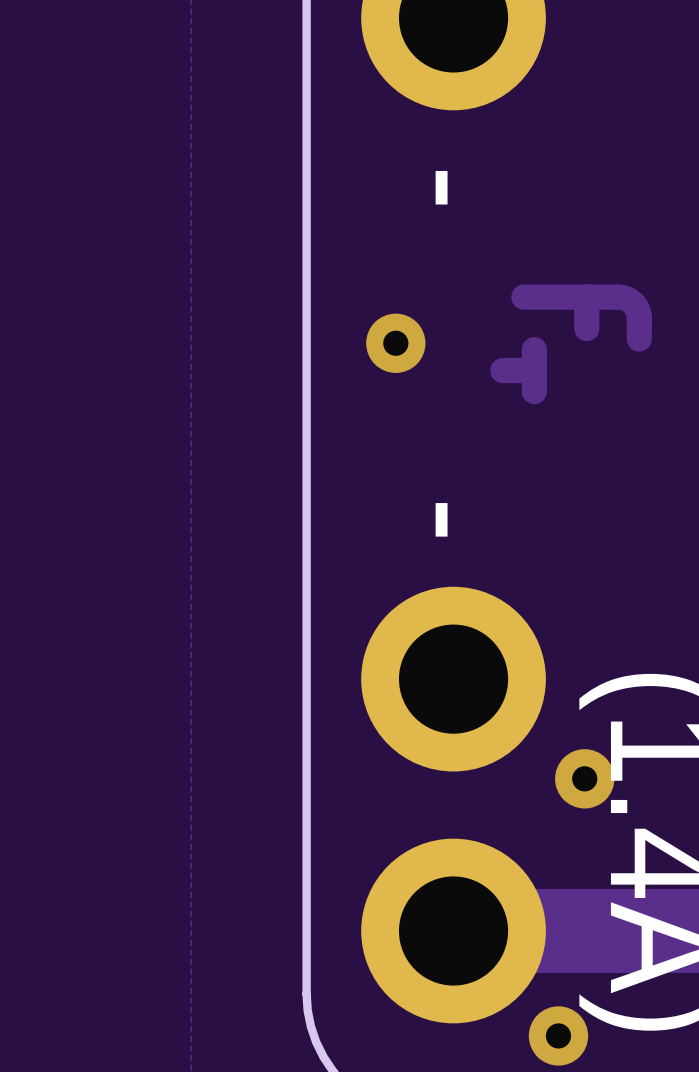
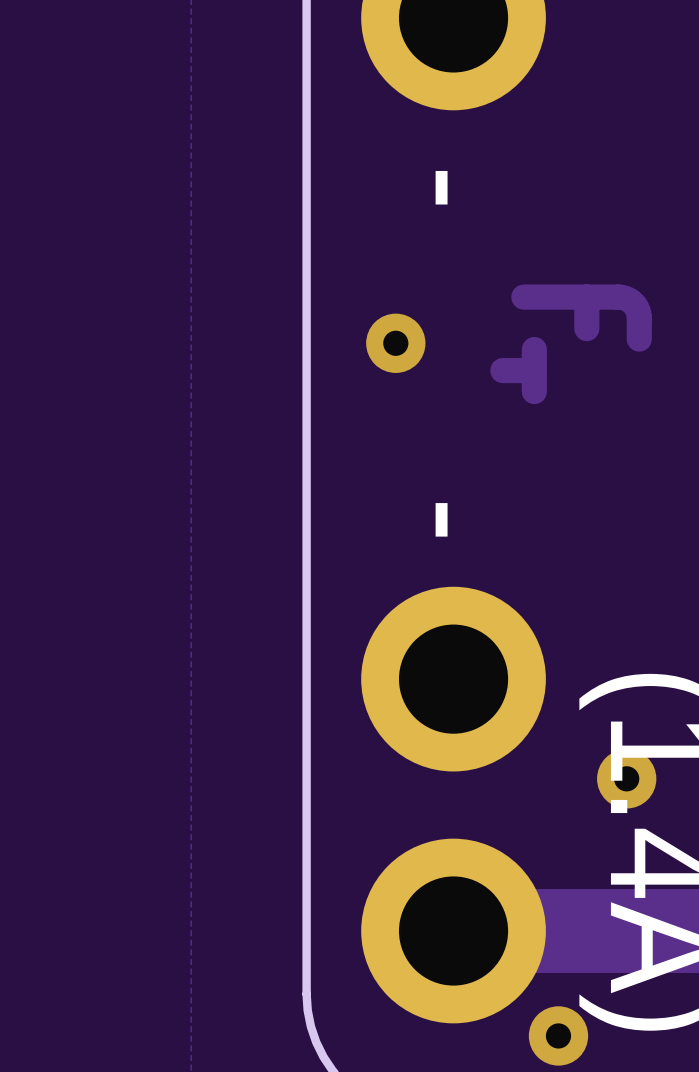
via position: (584, 778) -> (626, 778)

